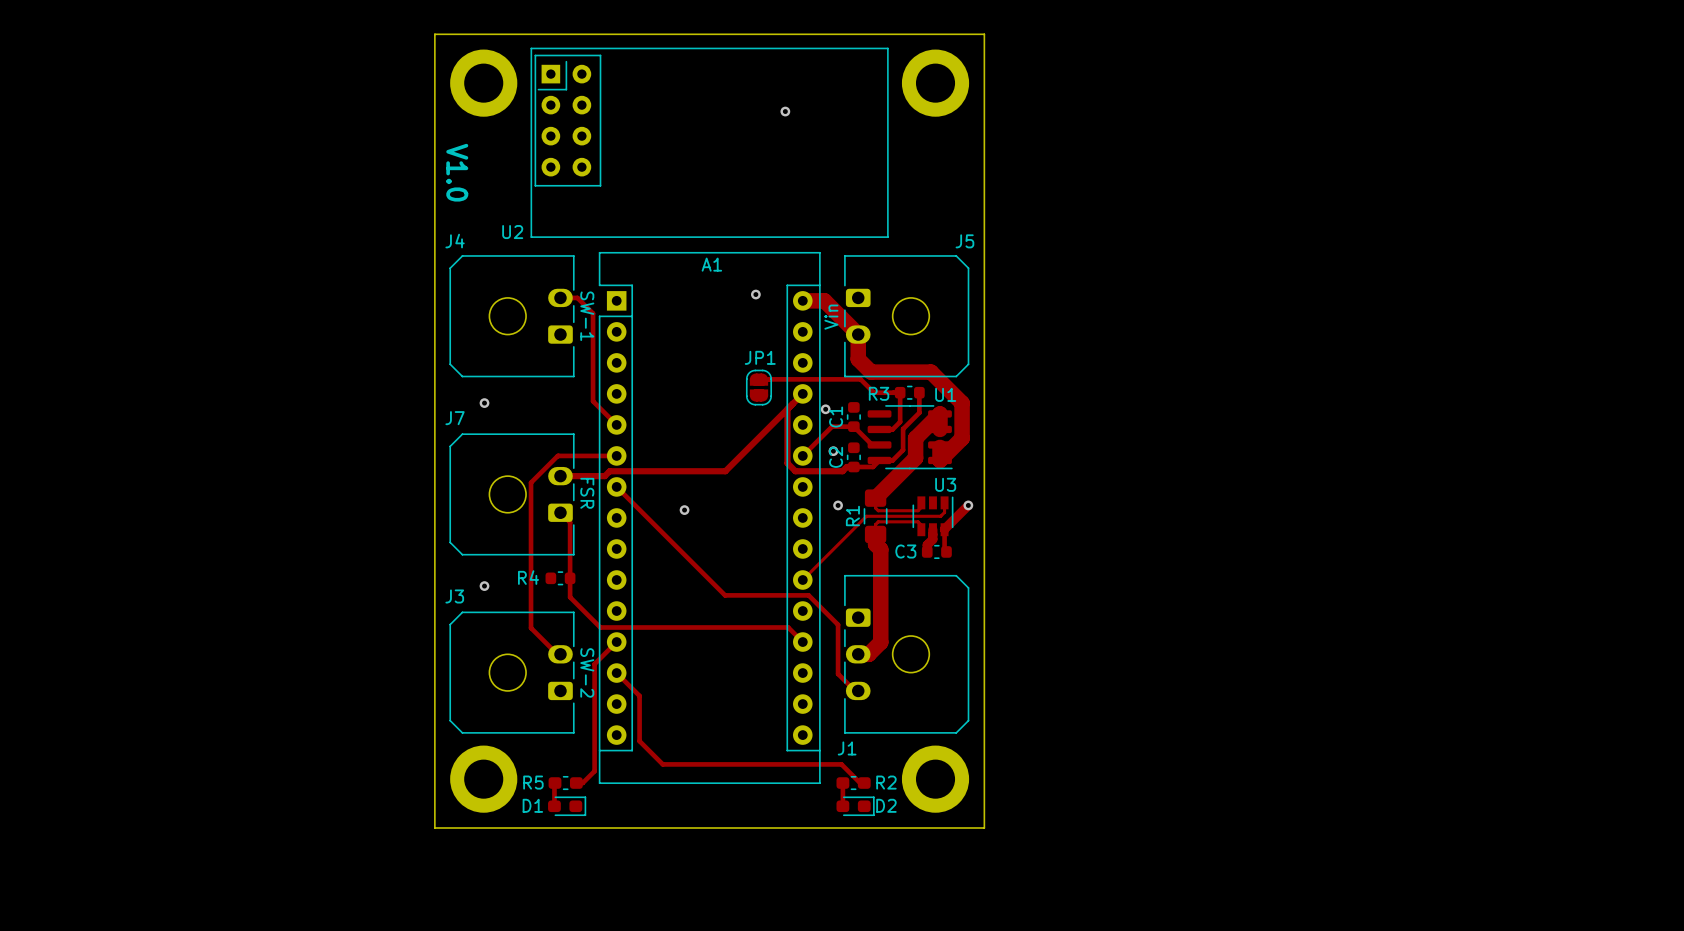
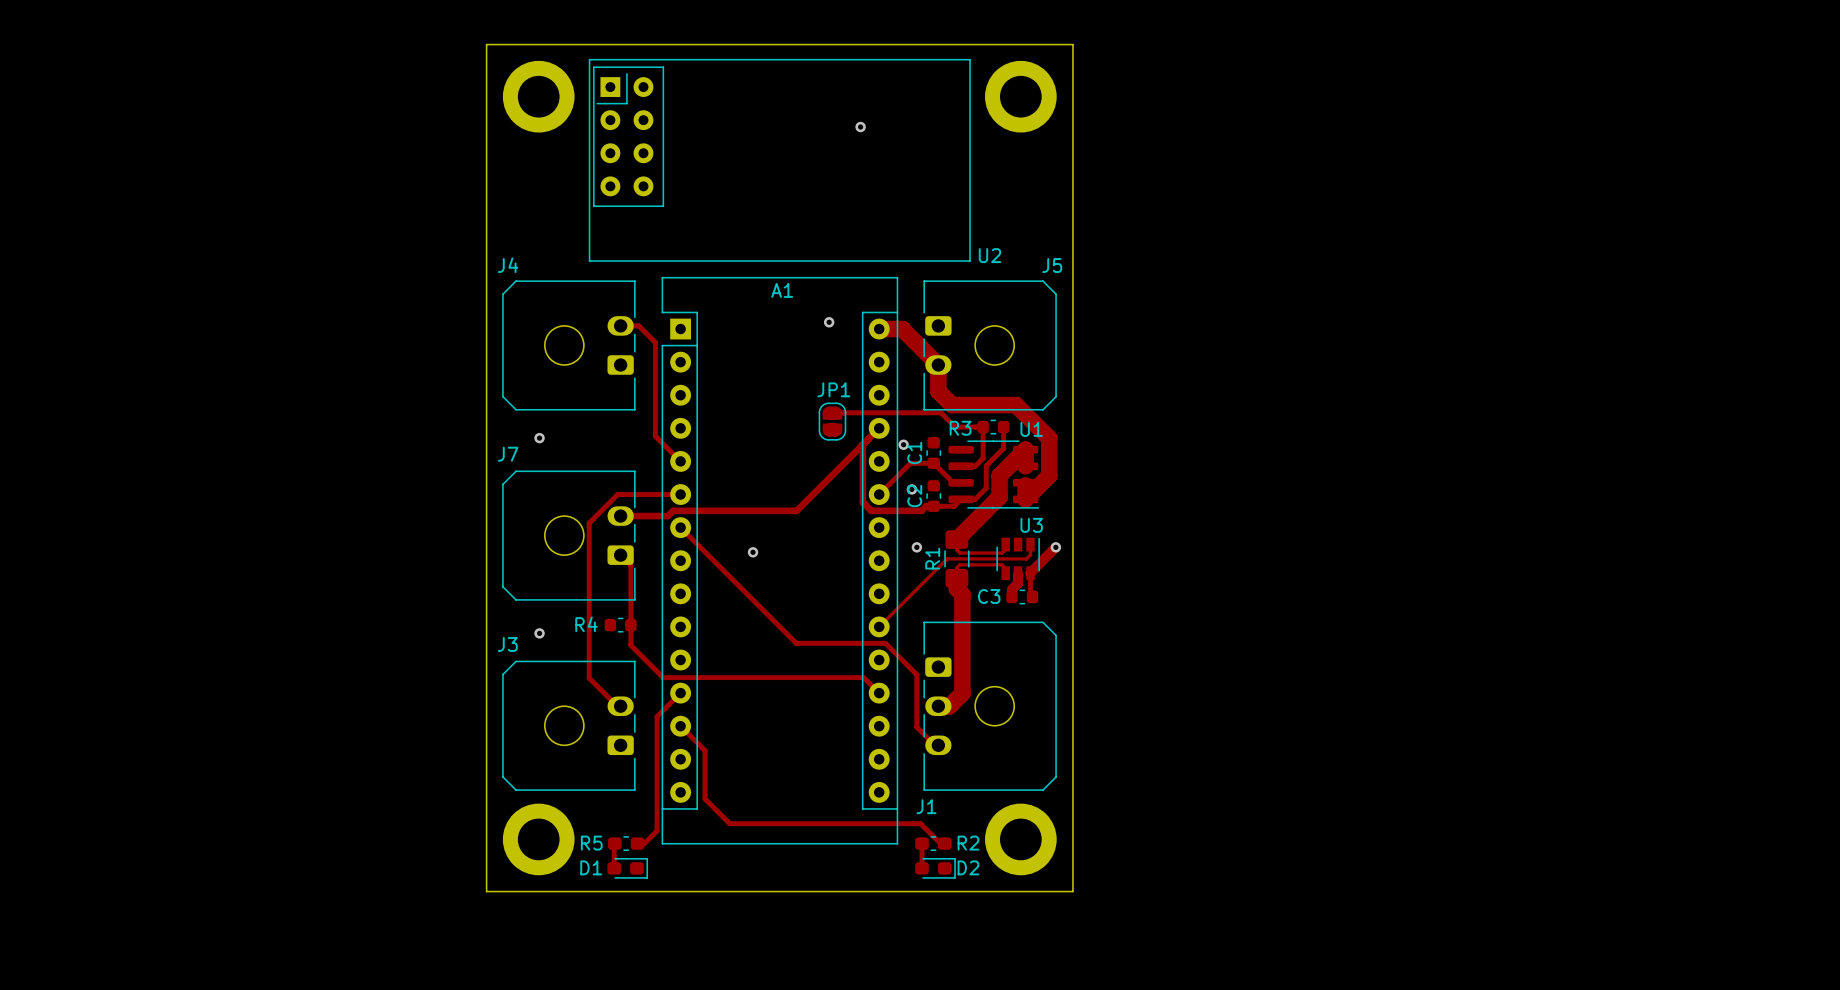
text: V1.0 (457, 172) -> none
U2 name position: U2 (512, 232) -> U2 (989, 255)
text: SW-1 (587, 316) -> none
text: Vin (831, 317) -> none
text: FSR (587, 493) -> none
text: SW-2 (587, 672) -> none

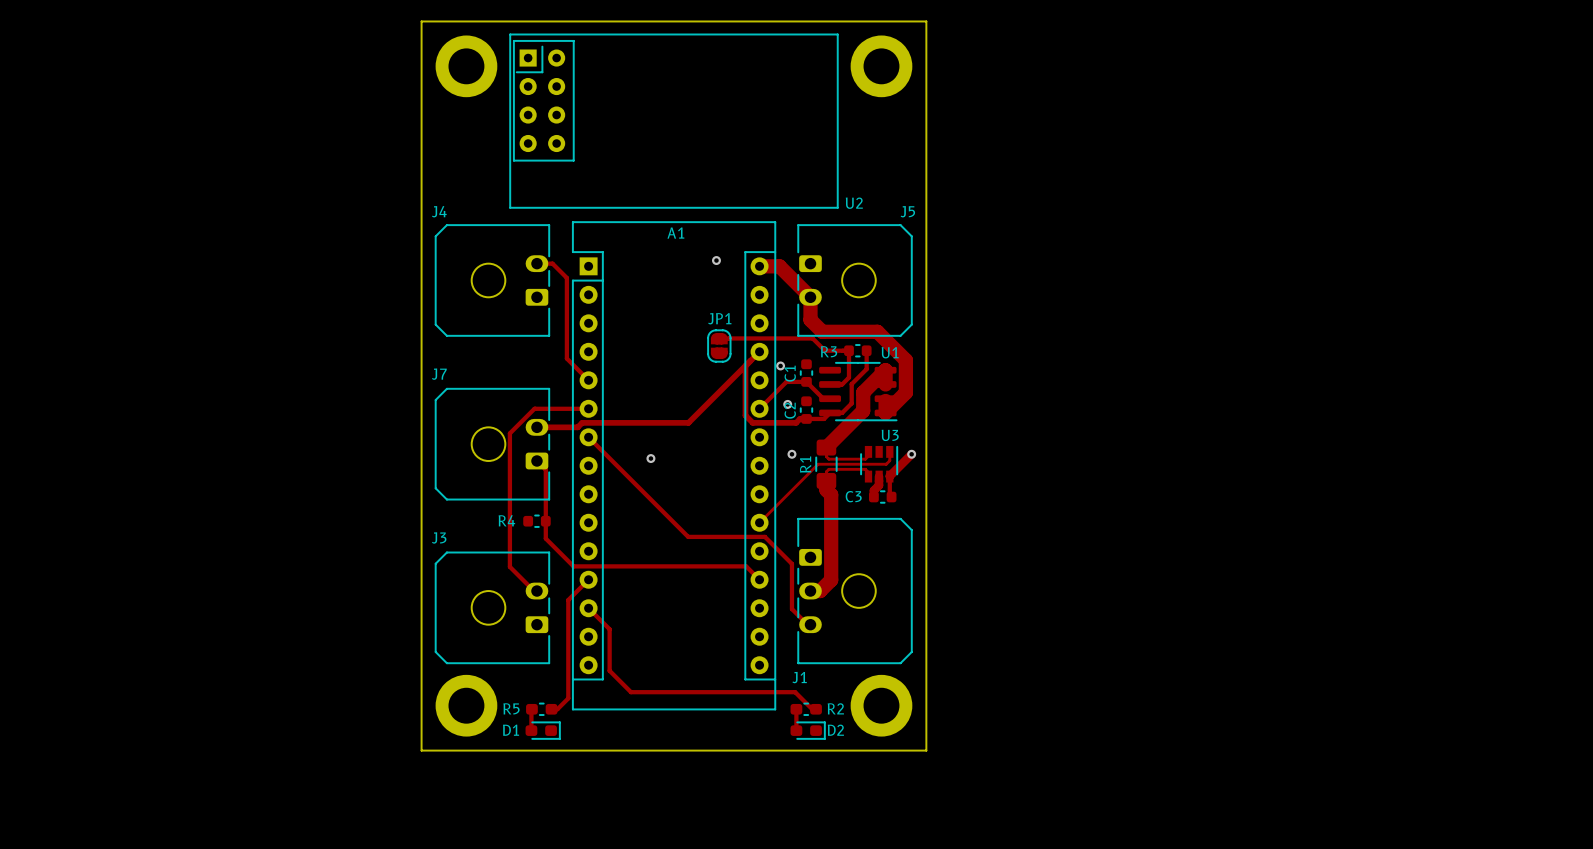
via: (860, 127) -> none
via: (539, 438) -> none
via: (539, 633) -> none

